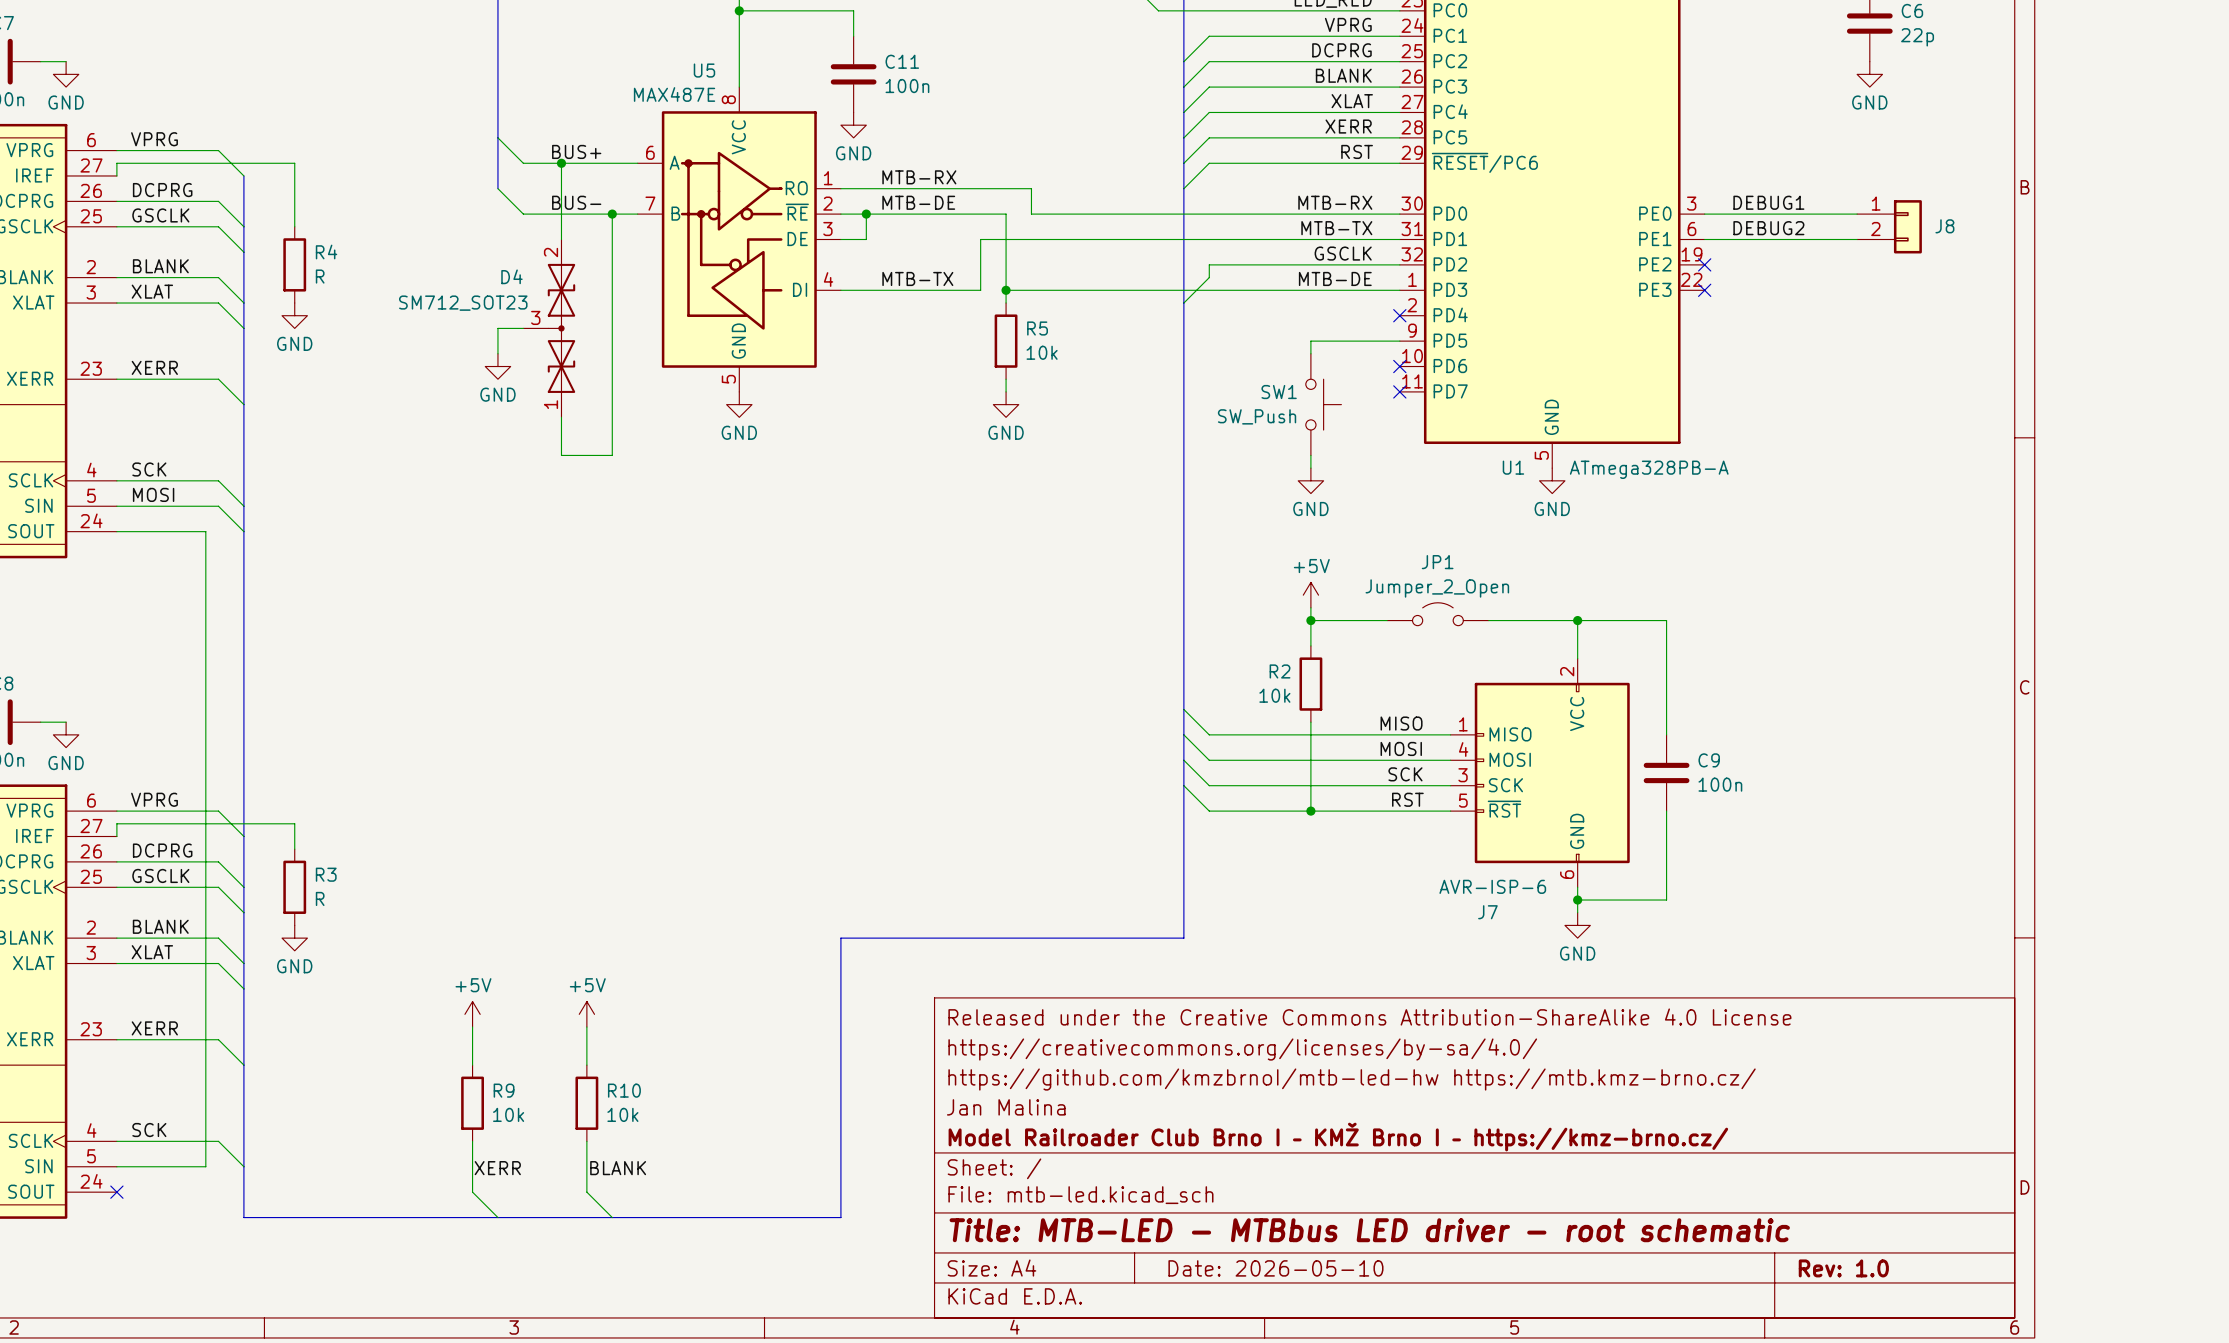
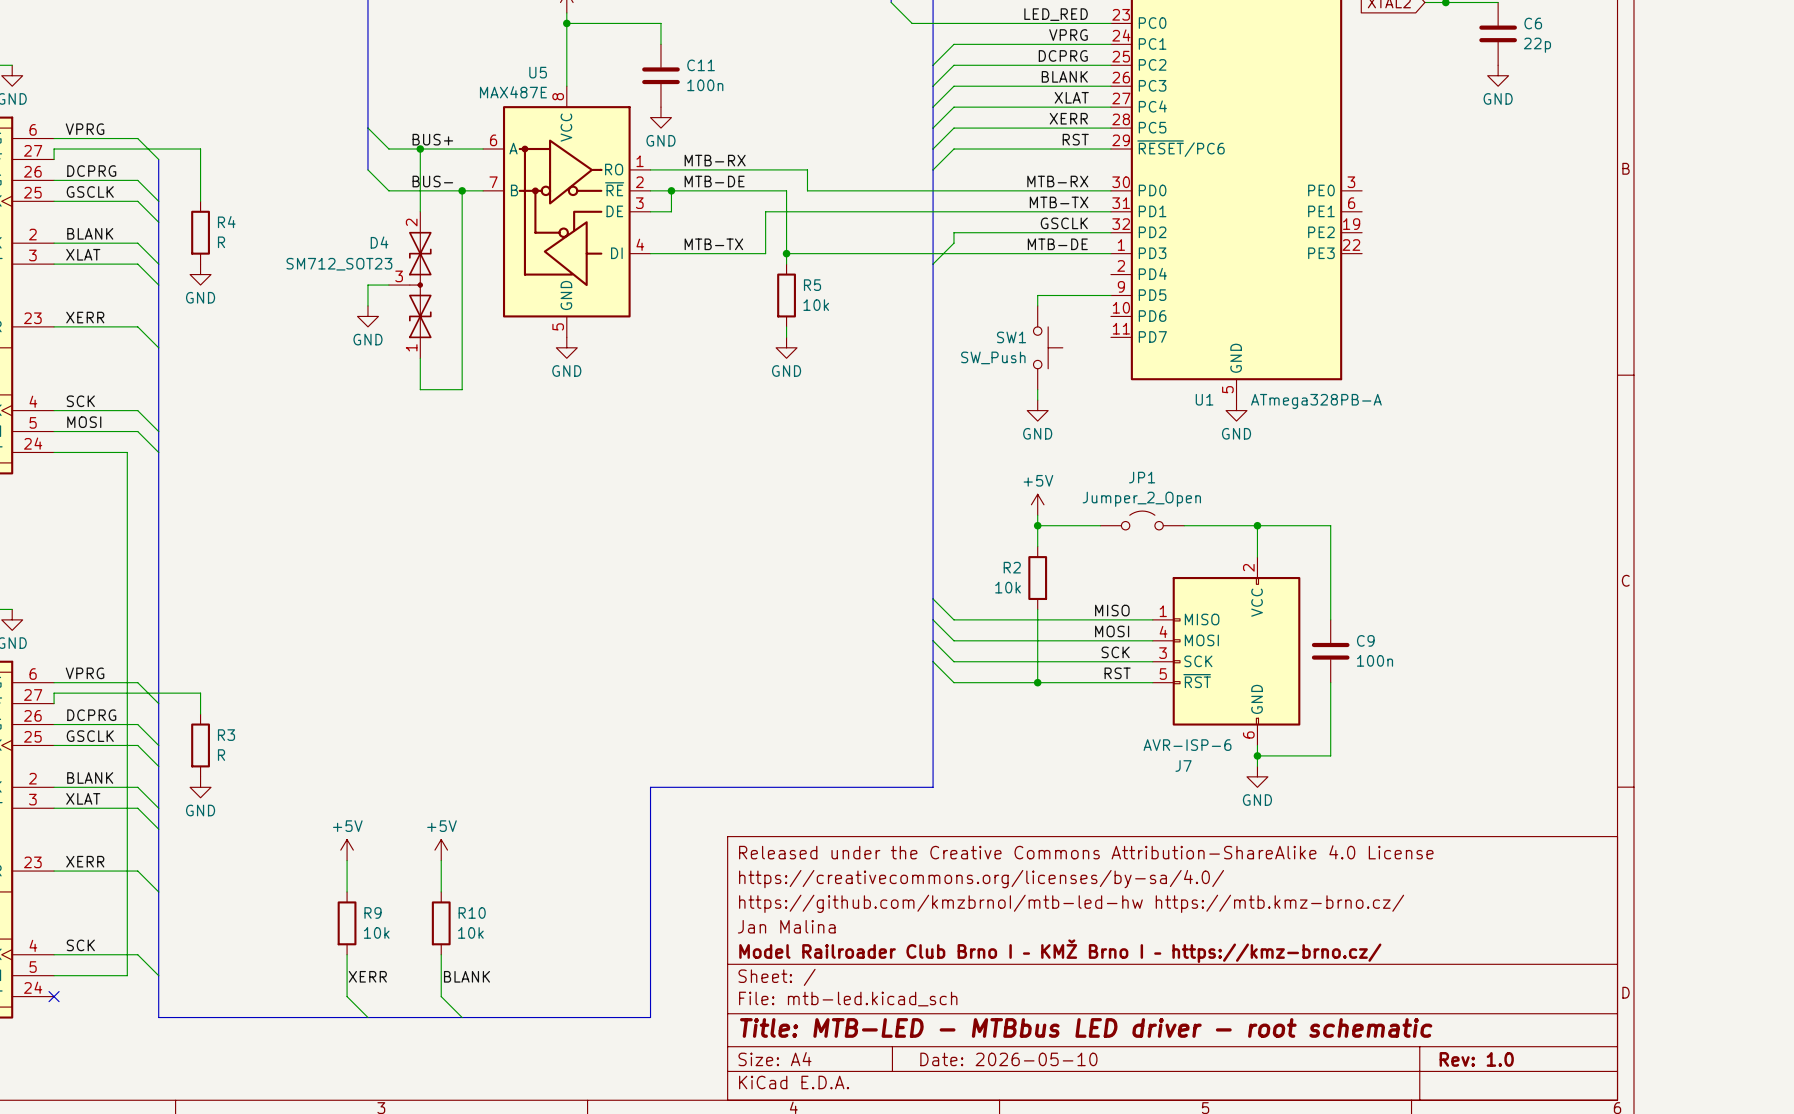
label: DEBUG1 (1768, 202) -> none
wire: (1704, 214) (1857, 214) -> none
J8: (1889, 226) -> none
label: DEBUG2 (1768, 228) -> none
wire: (1704, 239) (1857, 239) -> none
no-connect mark: (1704, 264) -> none
no-connect mark: (1704, 290) -> none
no-connect mark: (1399, 315) -> none
no-connect mark: (1399, 366) -> none
no-connect mark: (1399, 391) -> none

